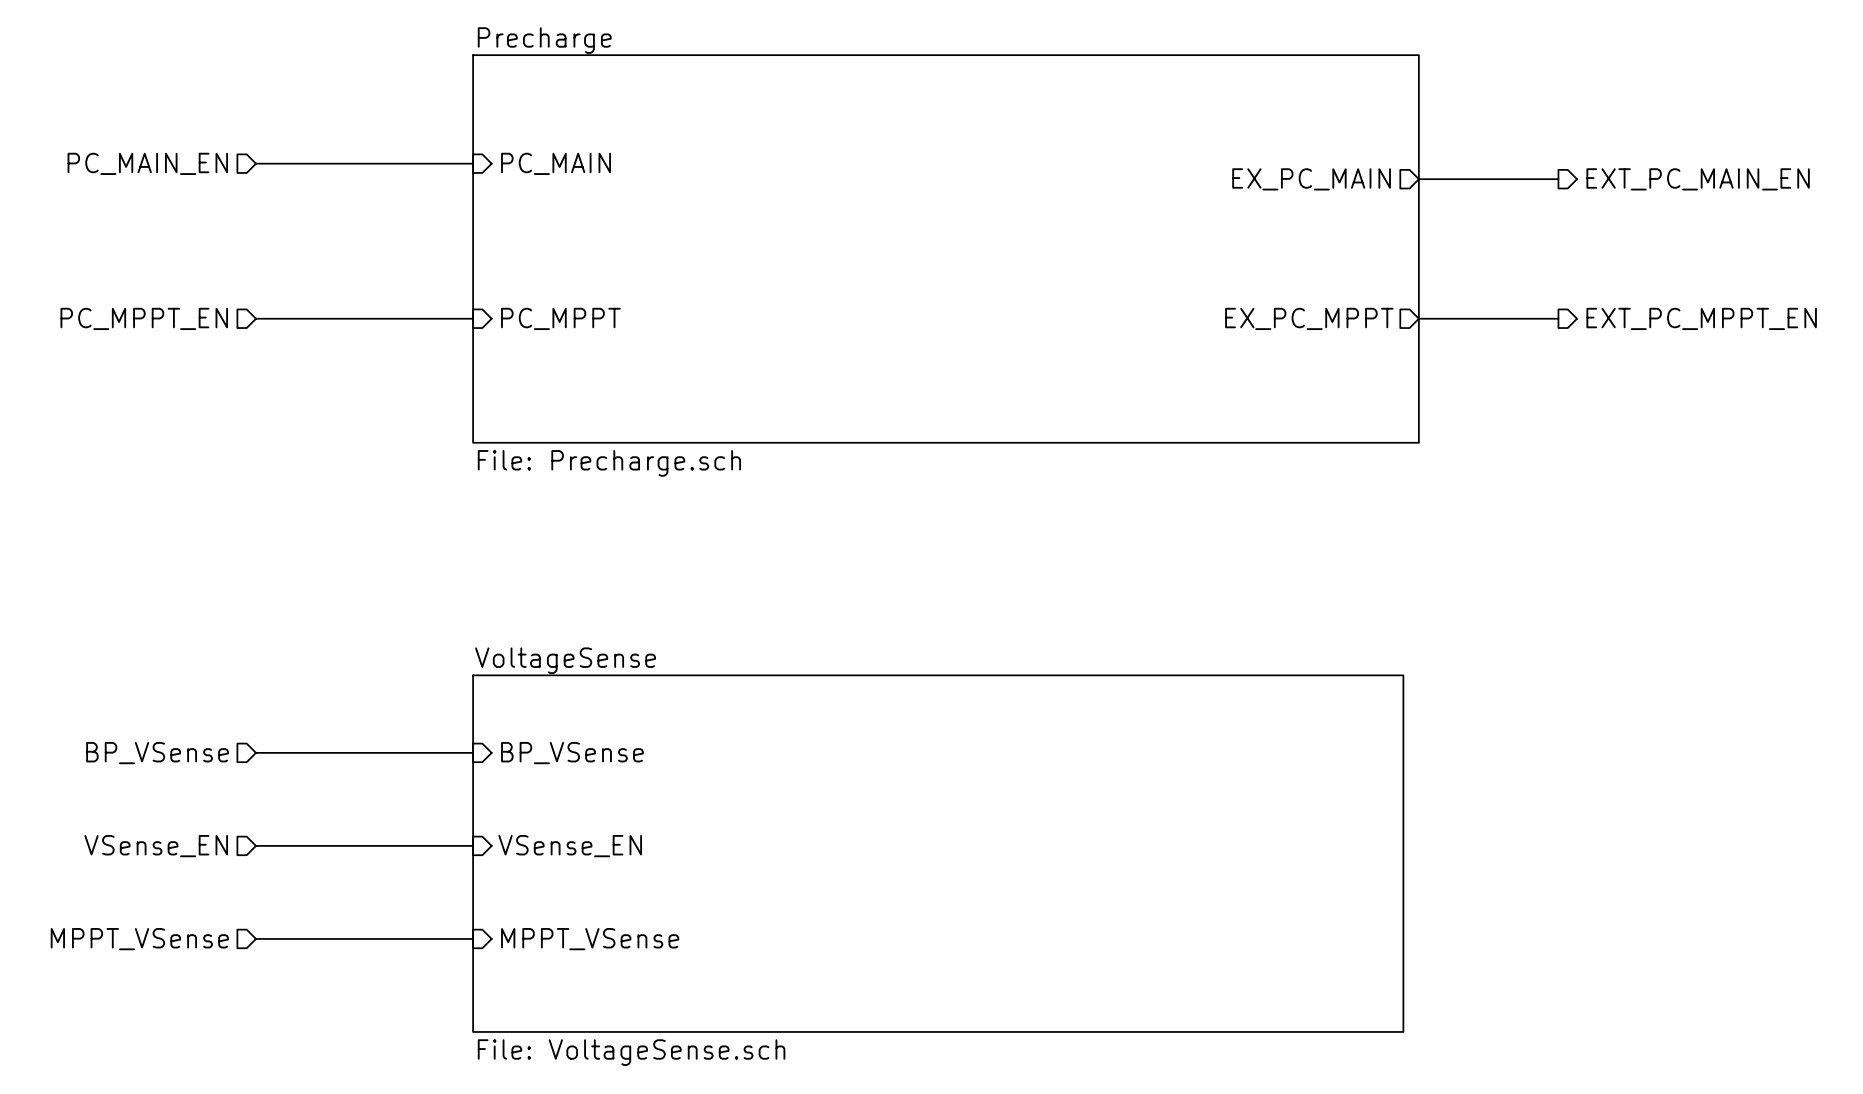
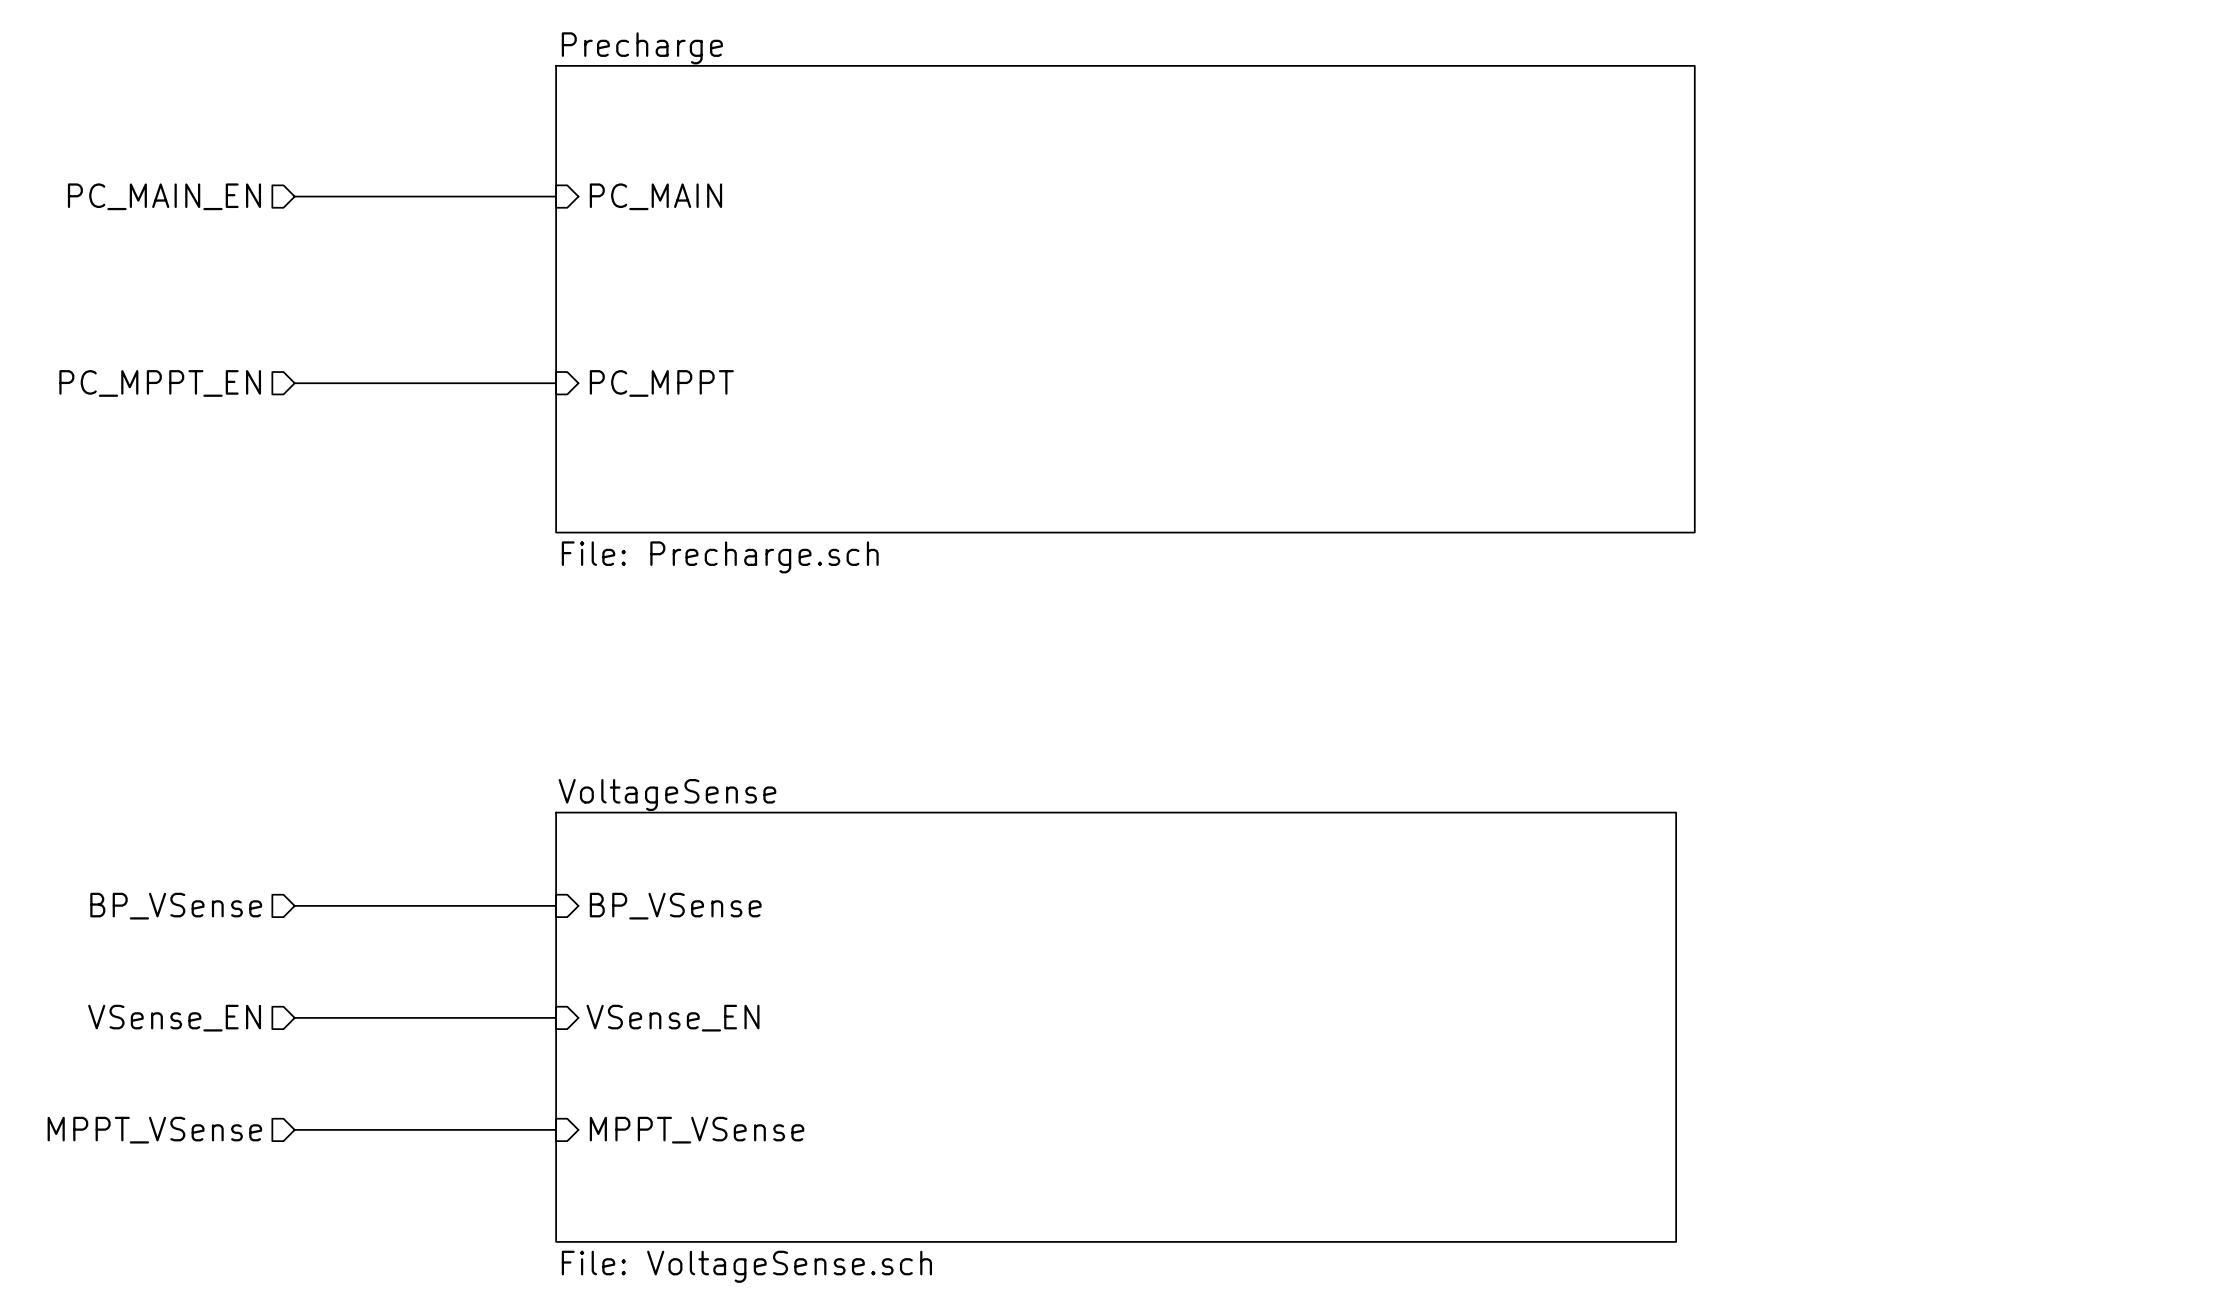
sheet pin: EX_PC_MAIN (1311, 179) -> none
wire: (1418, 179) (1558, 179) -> none
hierarchical label: EXT_PC_MAIN_EN (1698, 179) -> none
sheet pin: EX_PC_MPPT (1309, 318) -> none
wire: (1418, 318) (1558, 318) -> none
hierarchical label: EXT_PC_MPPT_EN (1701, 318) -> none

